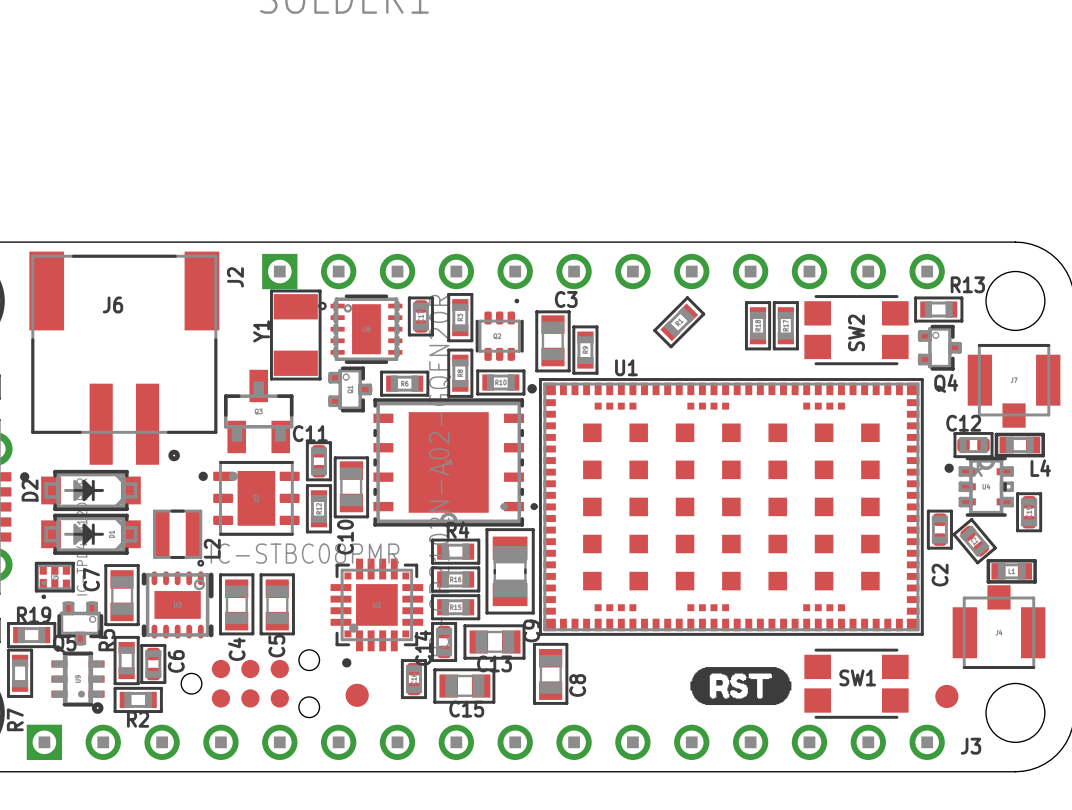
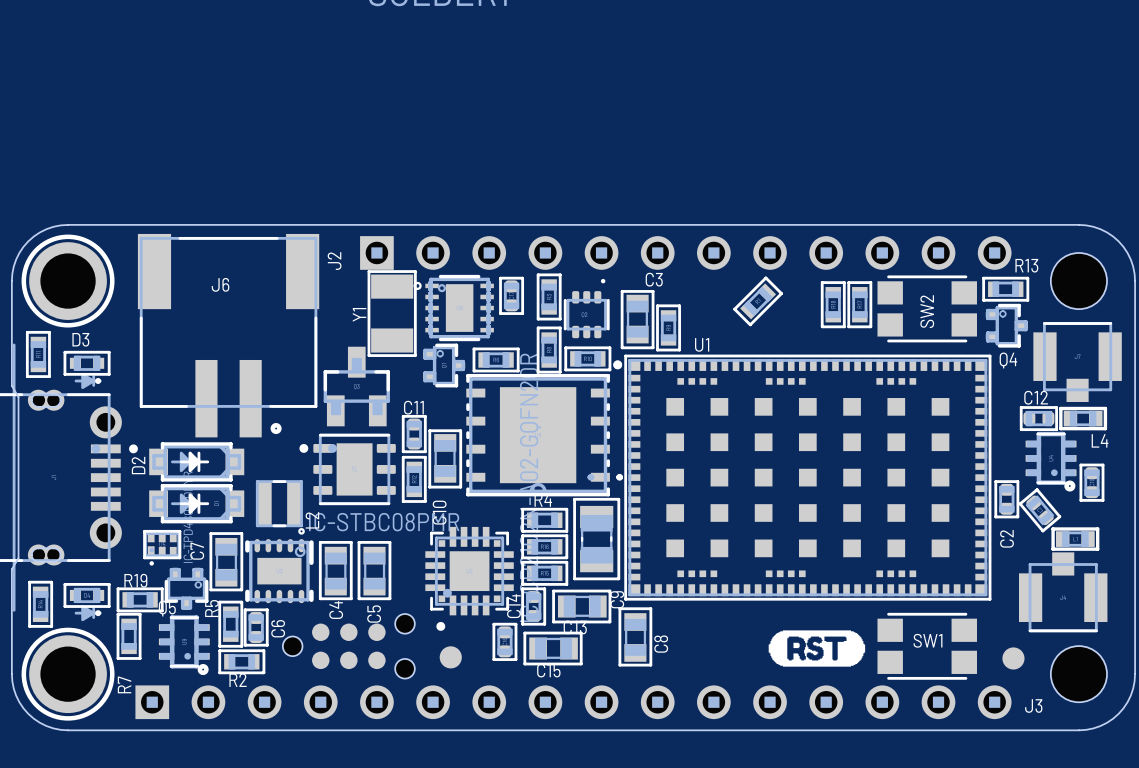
part footprint: [944, 456, 1014, 517] -> [1025, 431, 1077, 492]

